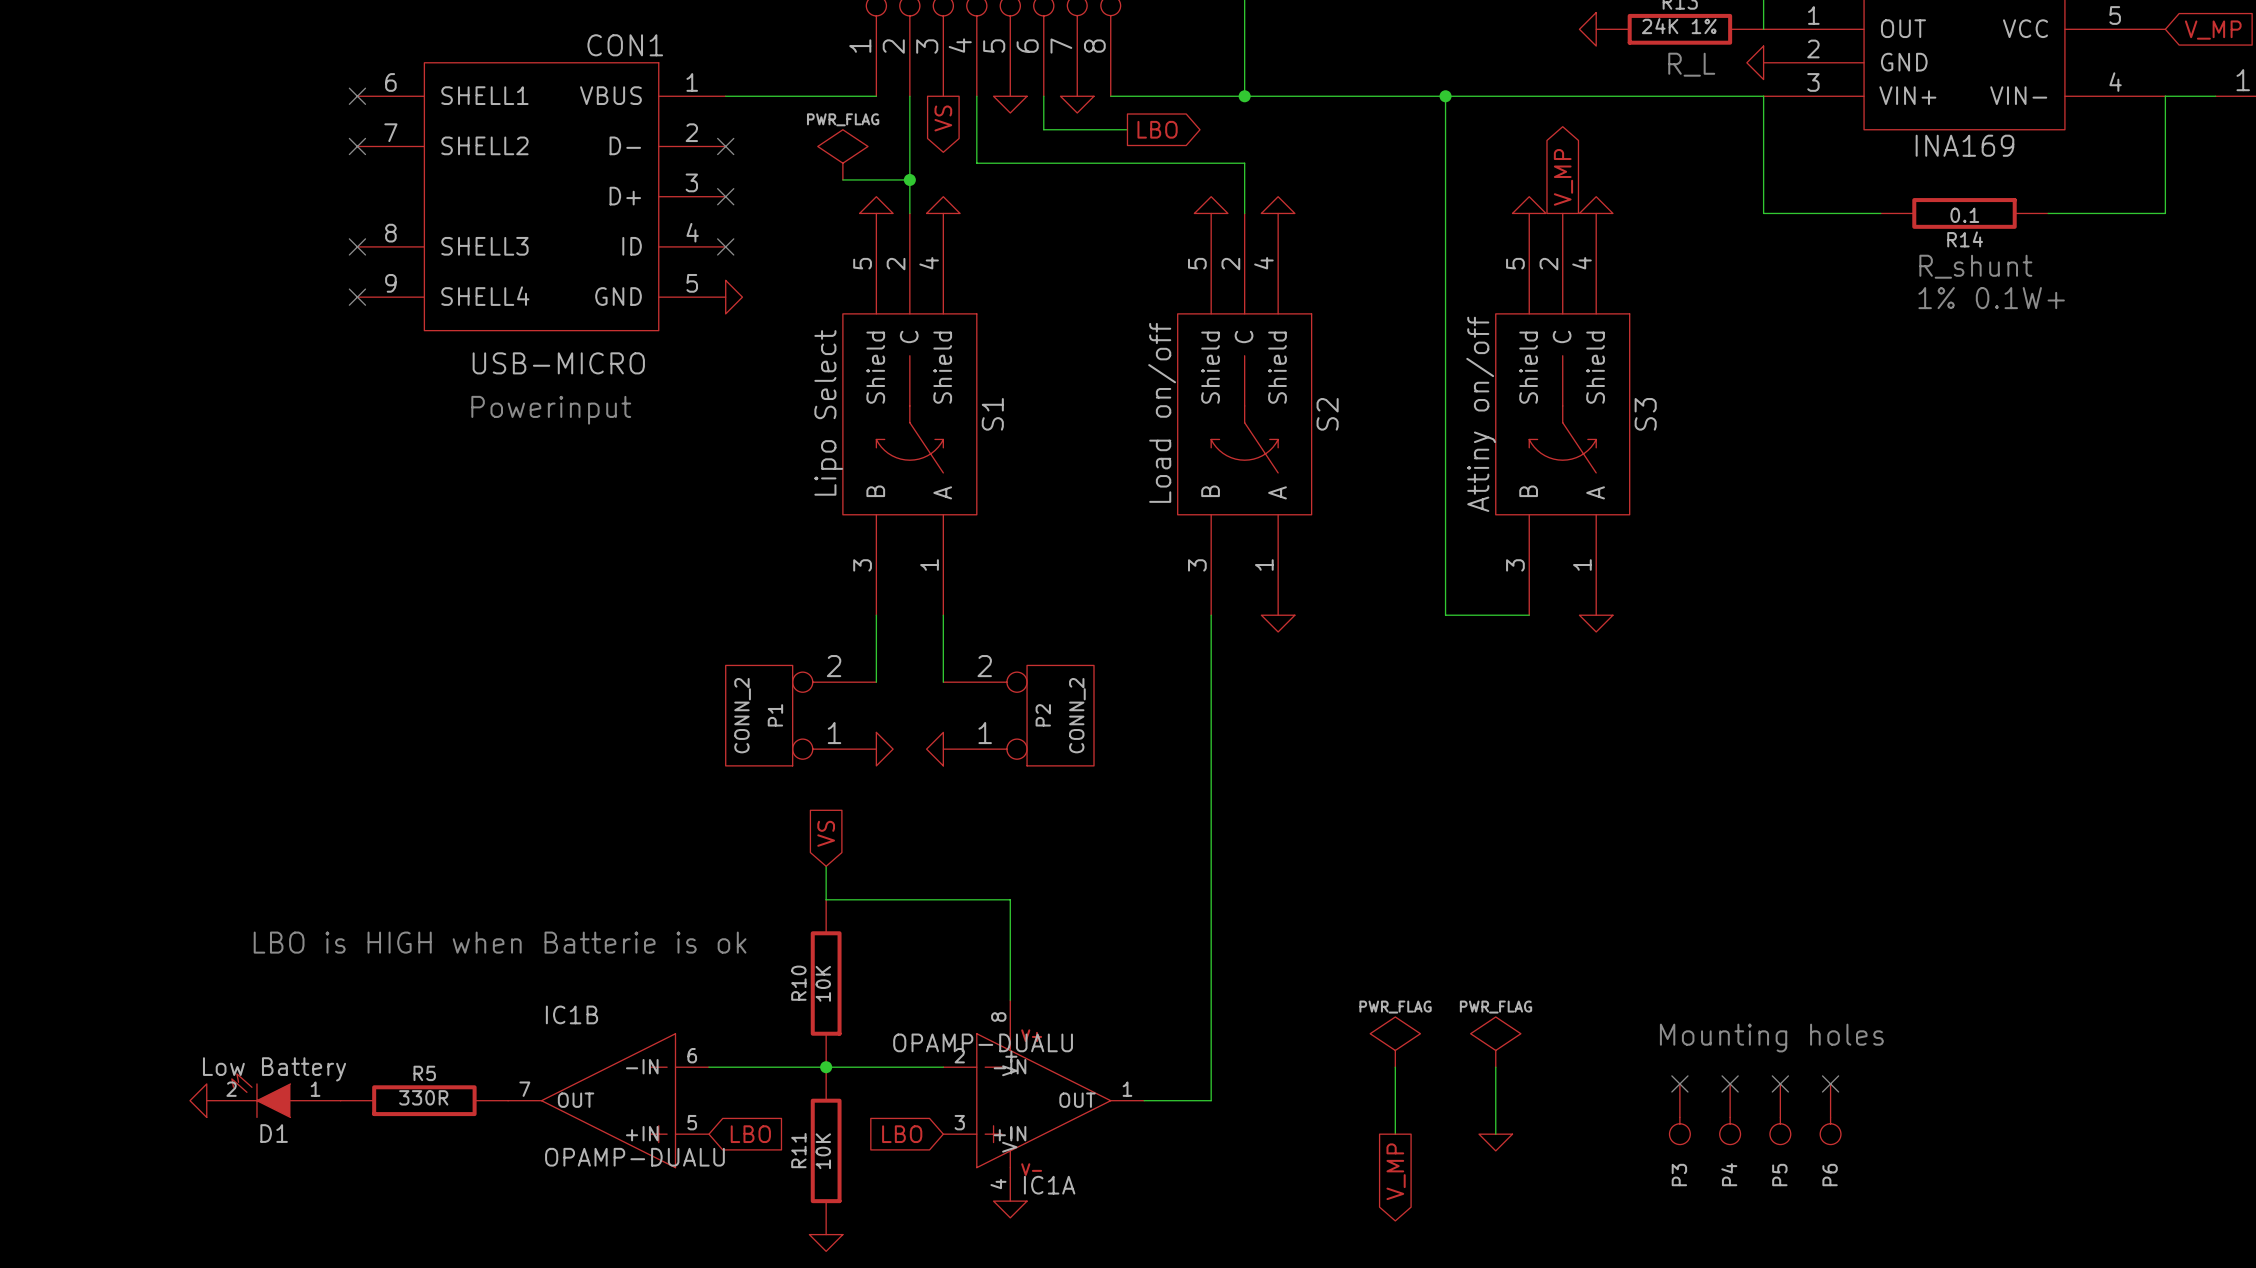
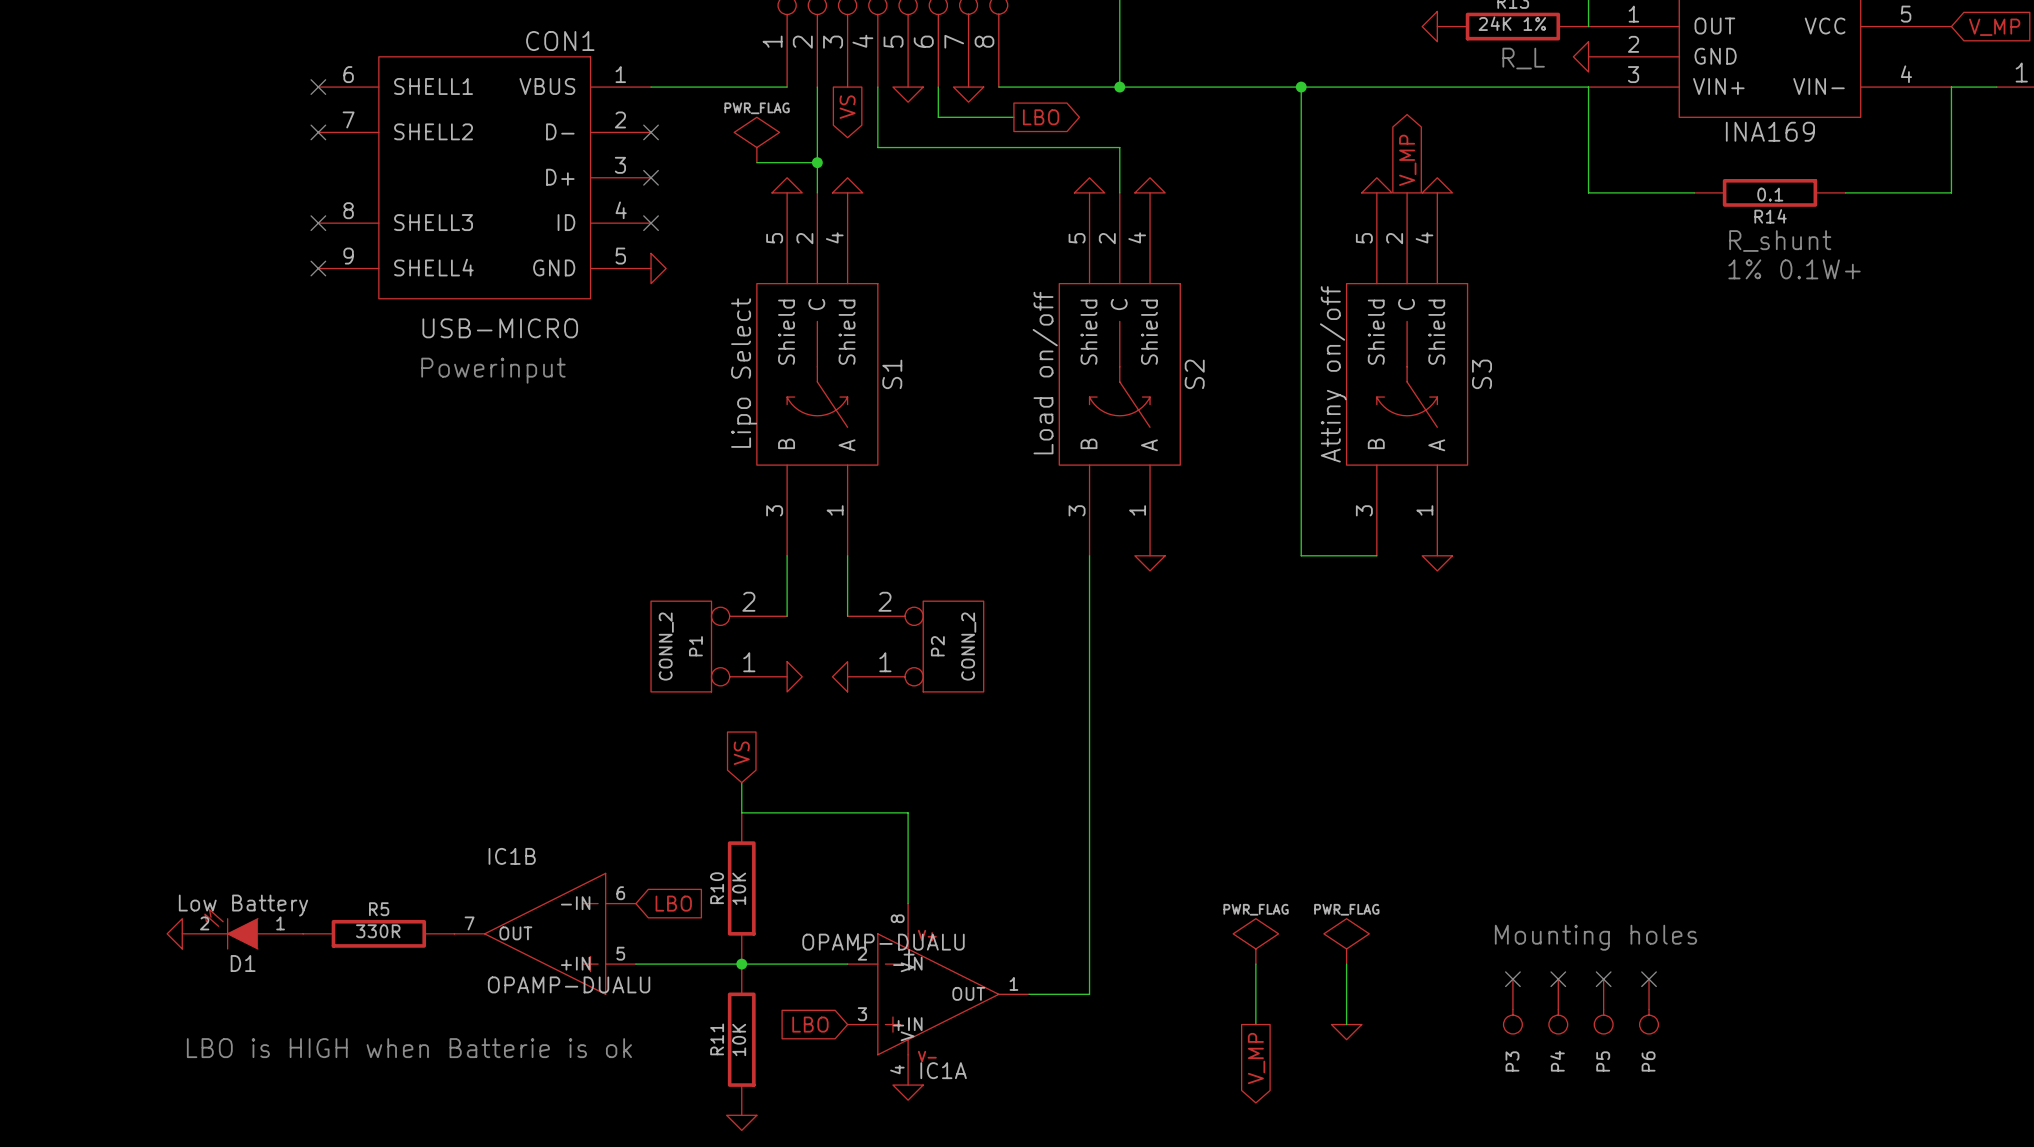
text position: LBO is HIGH when Batterie is ok (500, 942) -> LBO is HIGH when Batterie is ok (409, 1048)
D1 position: (273, 1095) -> (242, 929)
power symbol position: (198, 1100) -> (174, 933)
R5 position: (424, 1100) -> (378, 933)
IC1B position: (608, 1100) -> (545, 933)
global label position: LBO (750, 1134) -> LBO (673, 903)

